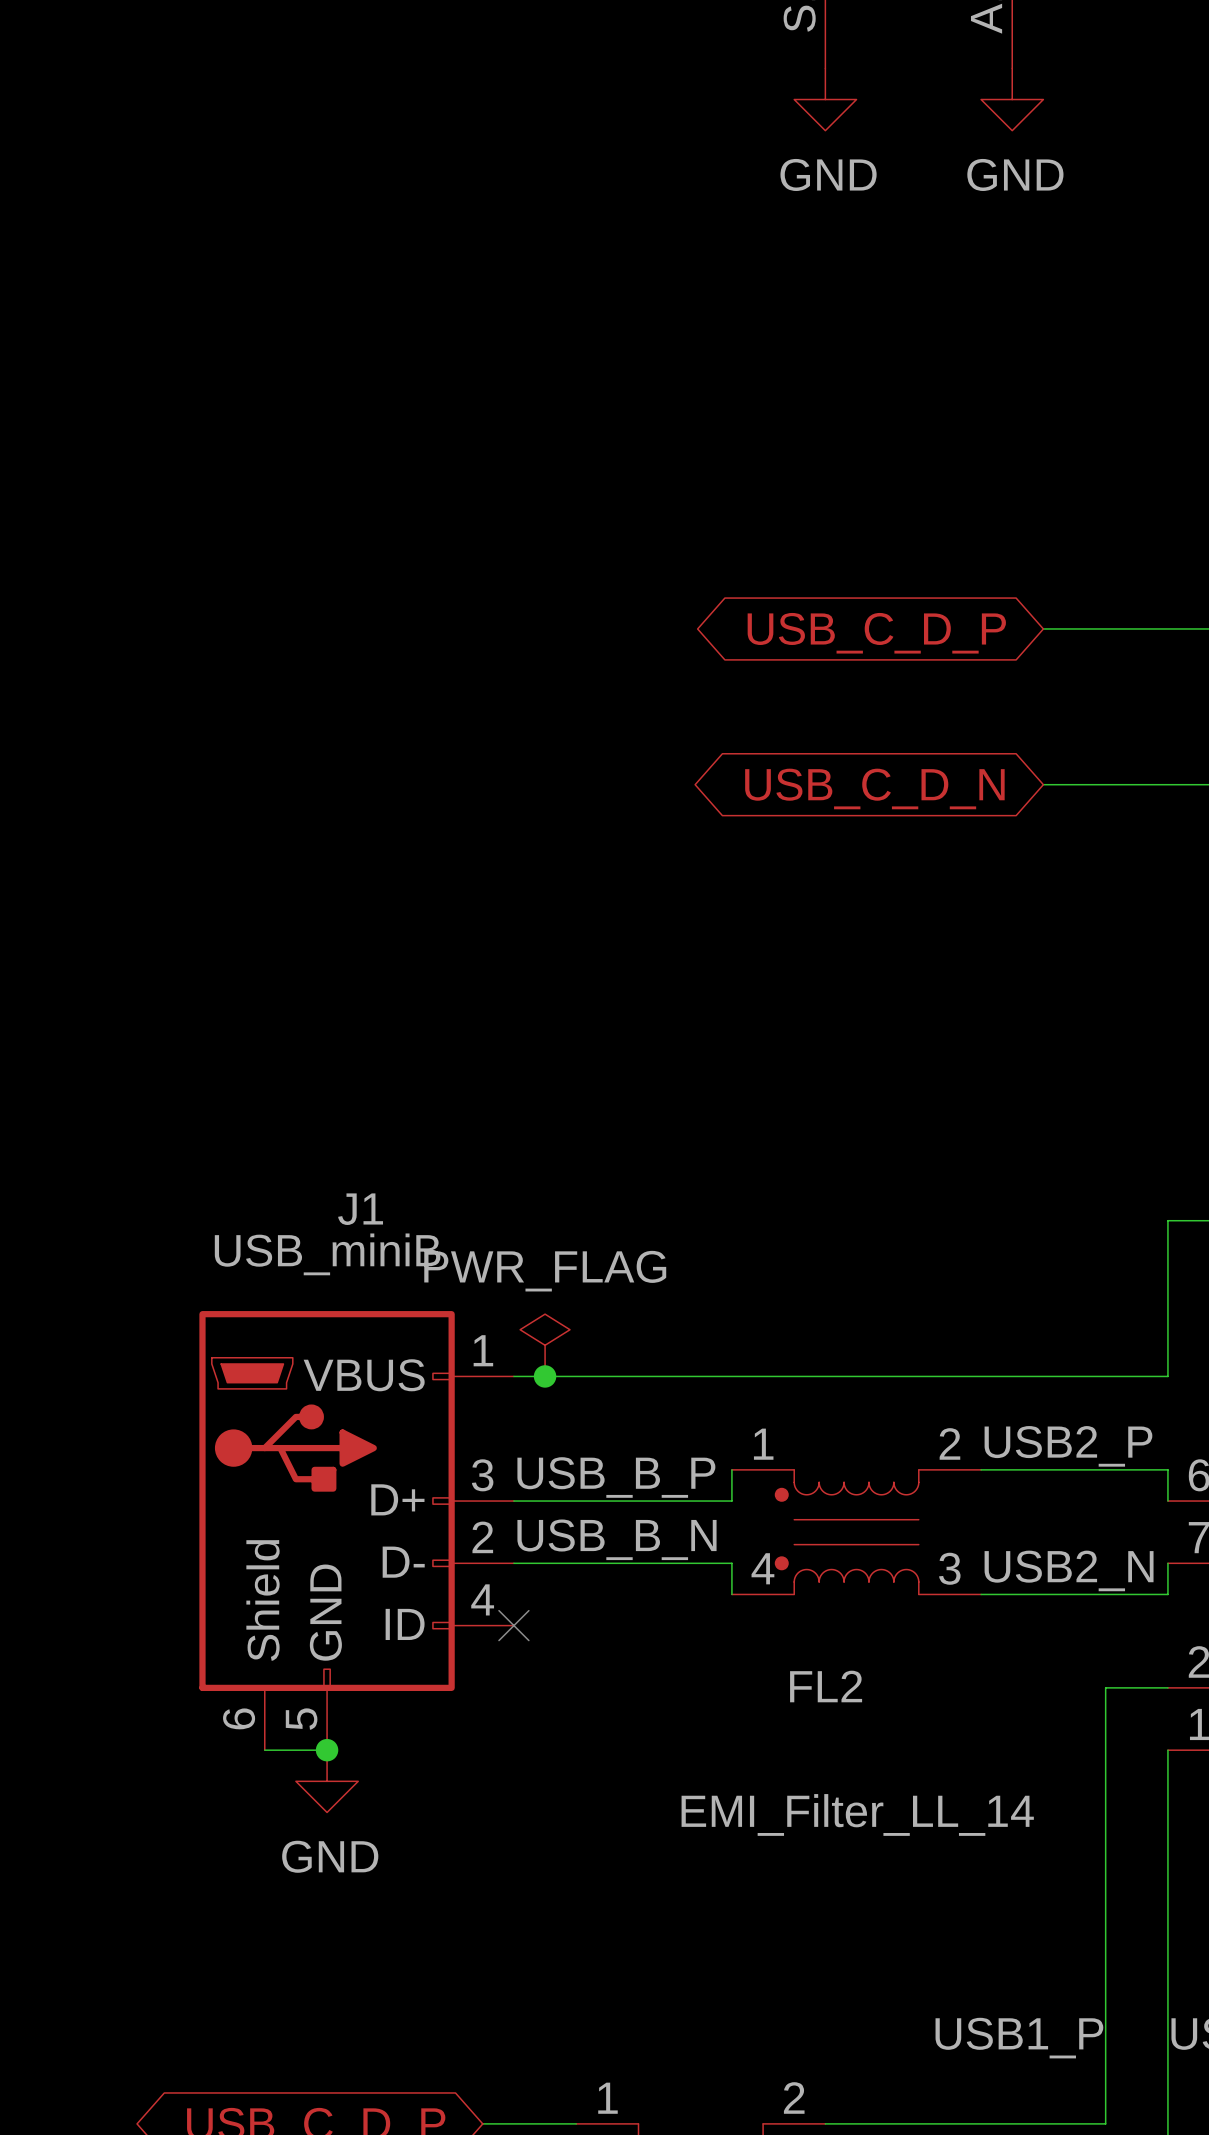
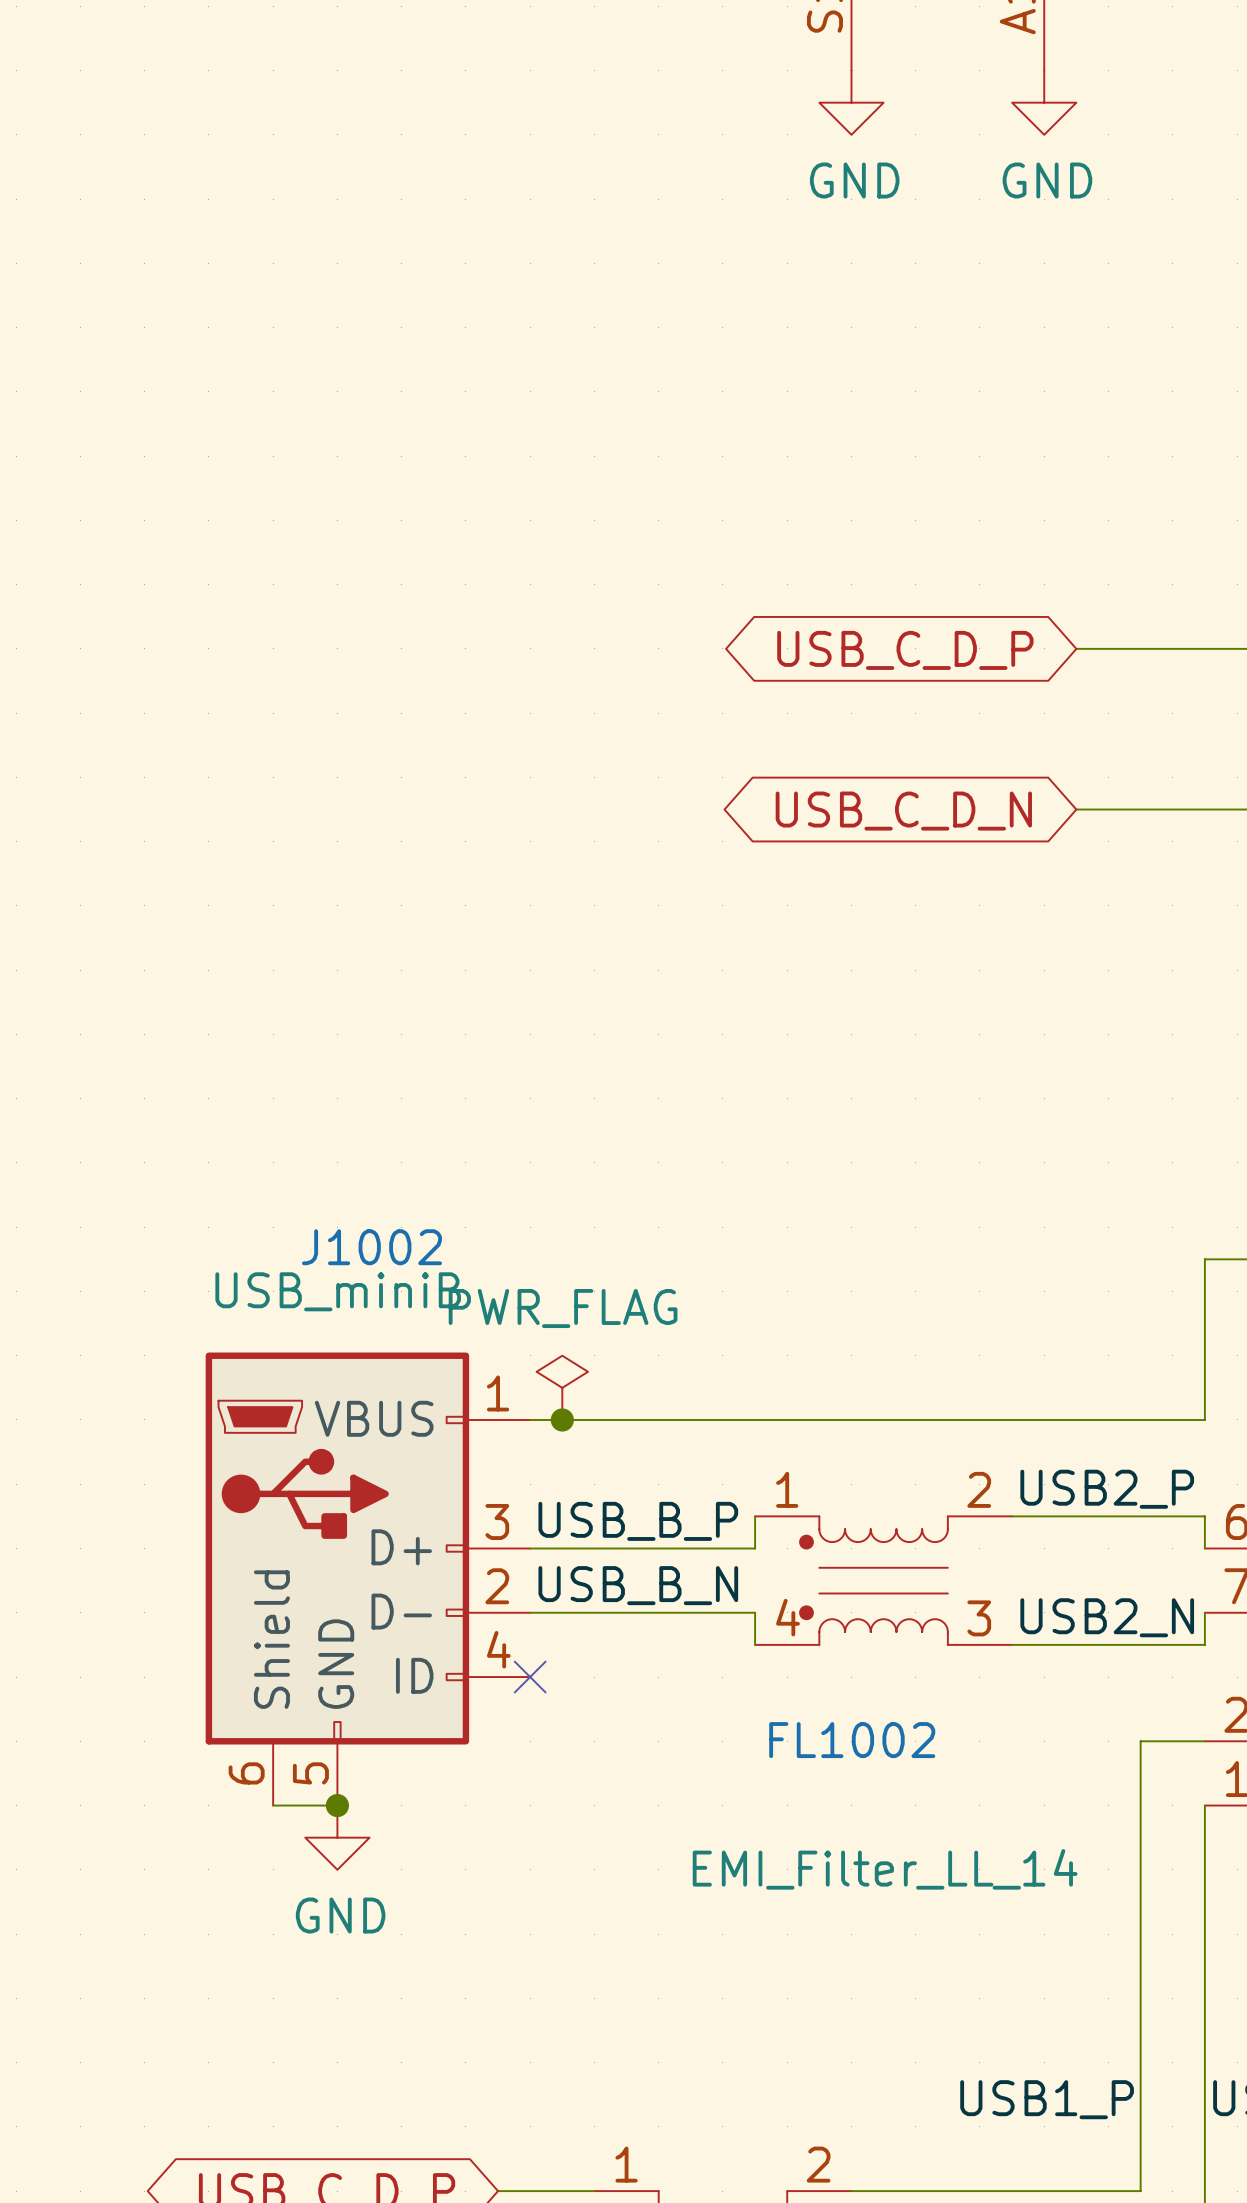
J1 name: J1 (360, 1209) -> J1002 (371, 1247)
FL2 name: FL2 (826, 1686) -> FL1002 (852, 1740)

